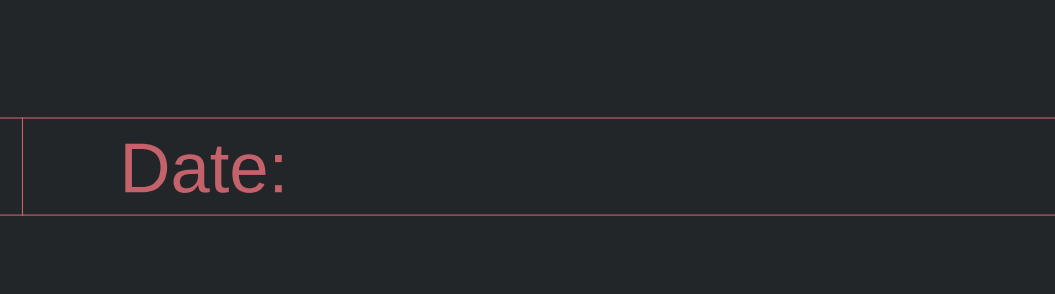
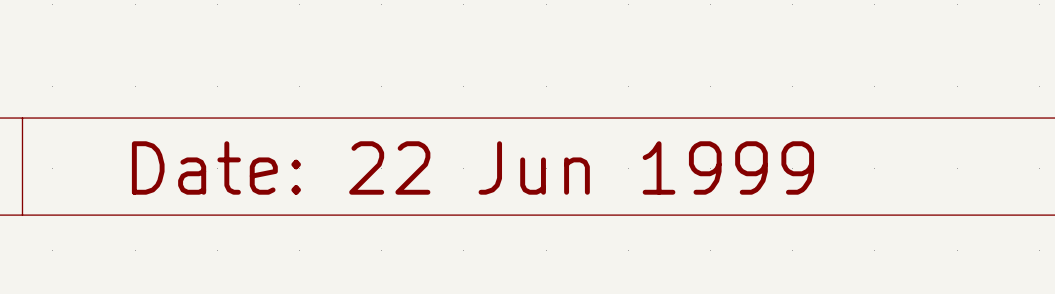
title block: Date: (203, 168) -> Date: 22 Jun 1999 (472, 167)

